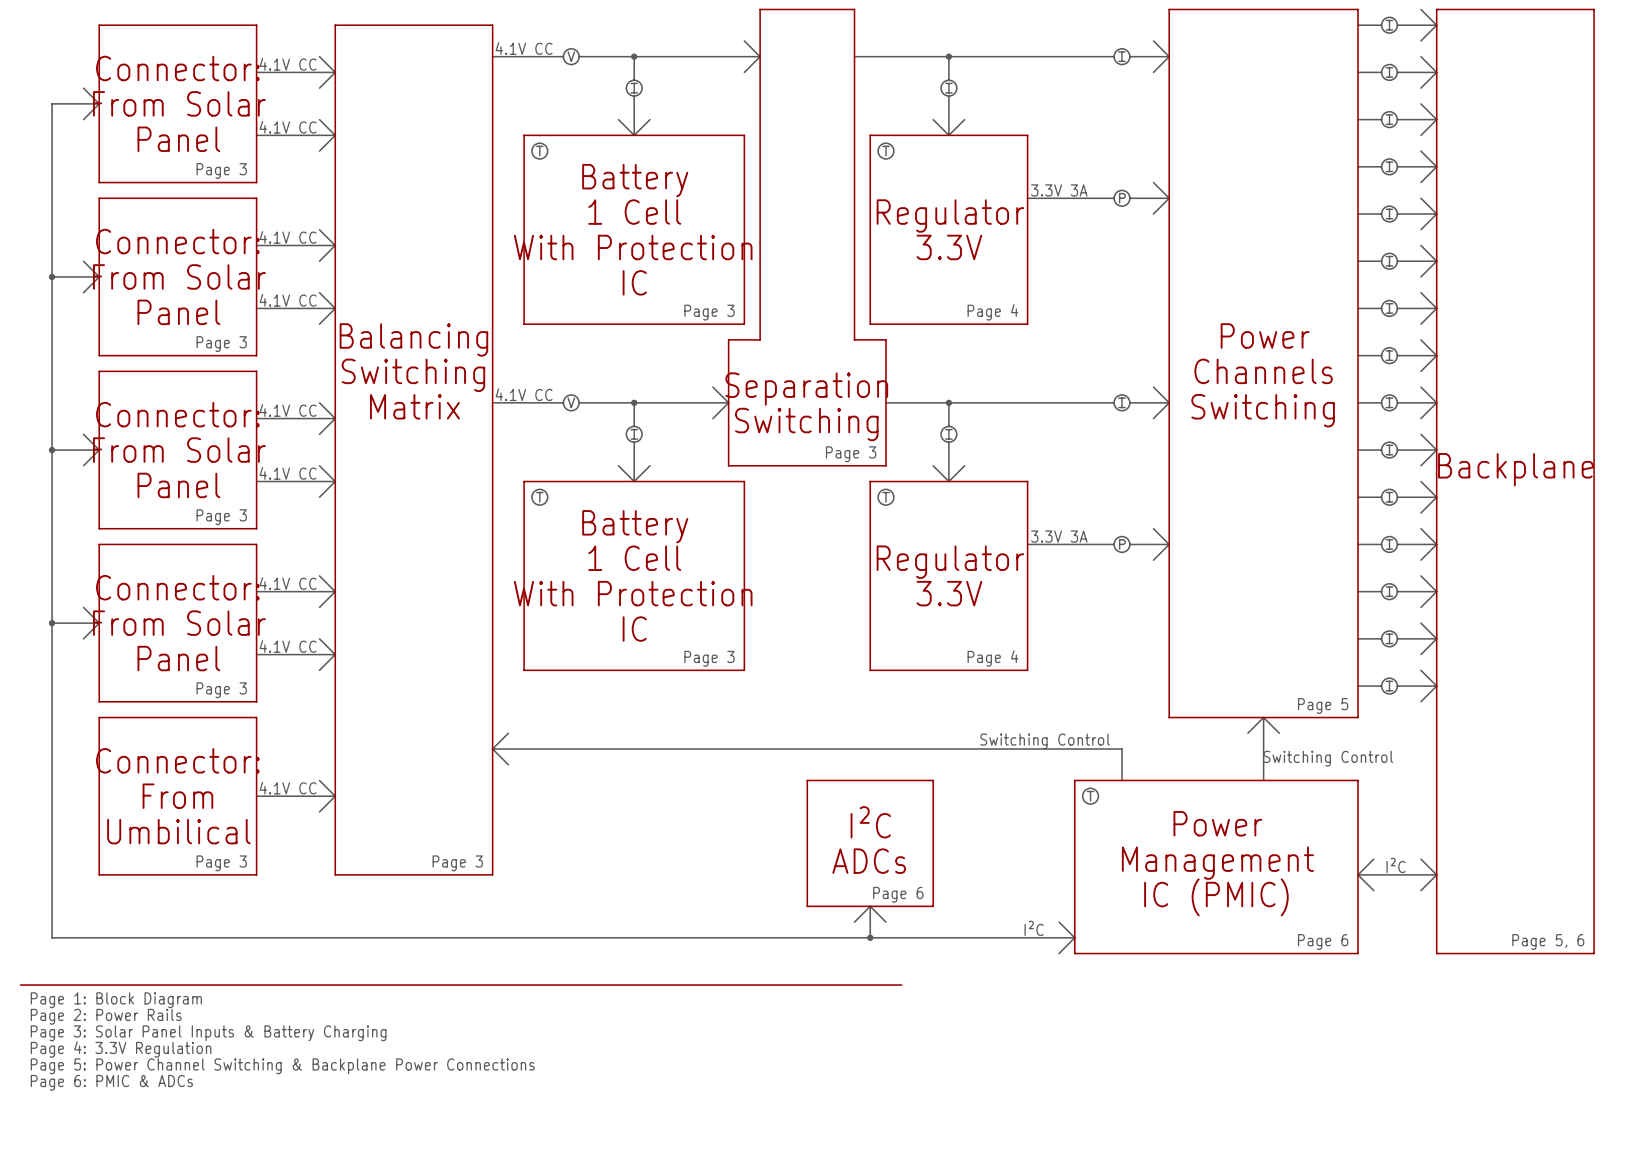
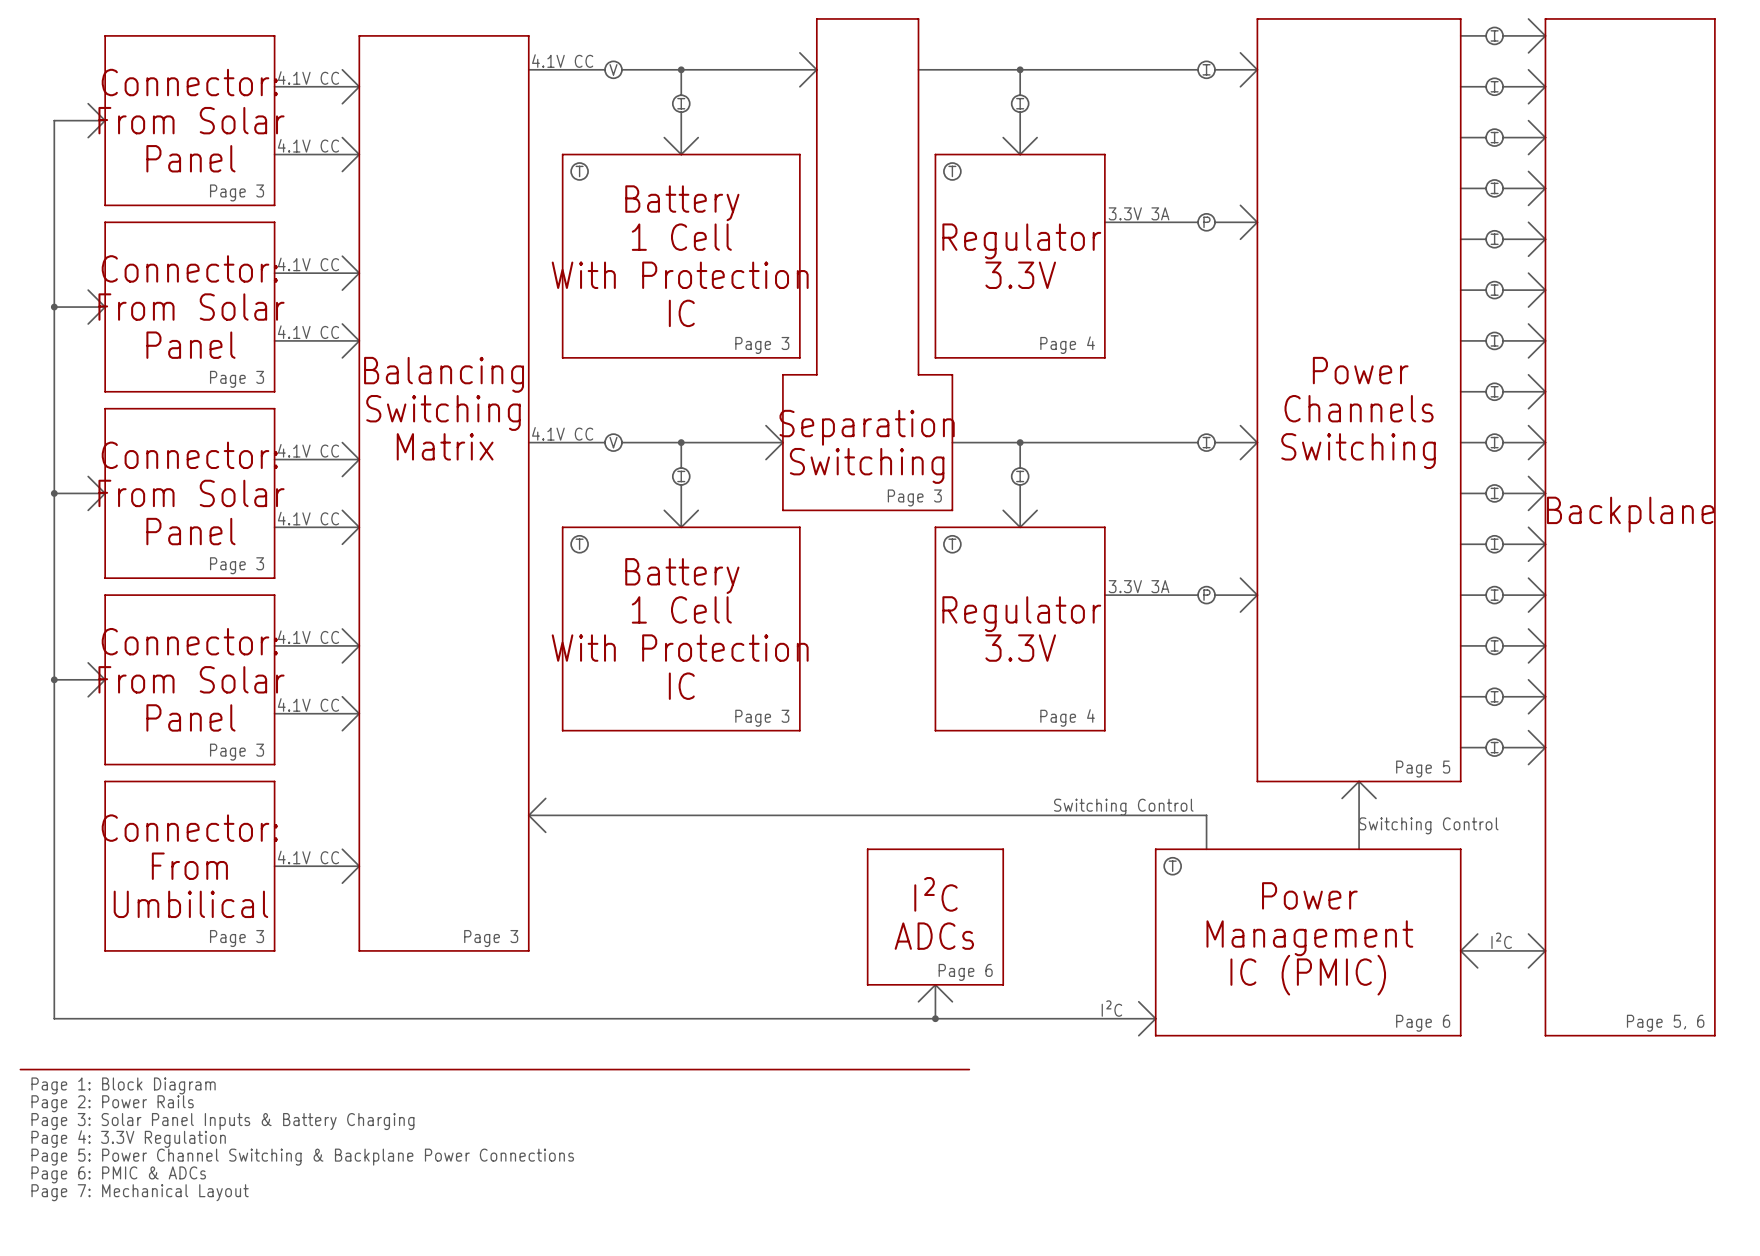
text: none -> Page 7: Mechanical Layout (140, 1192)

